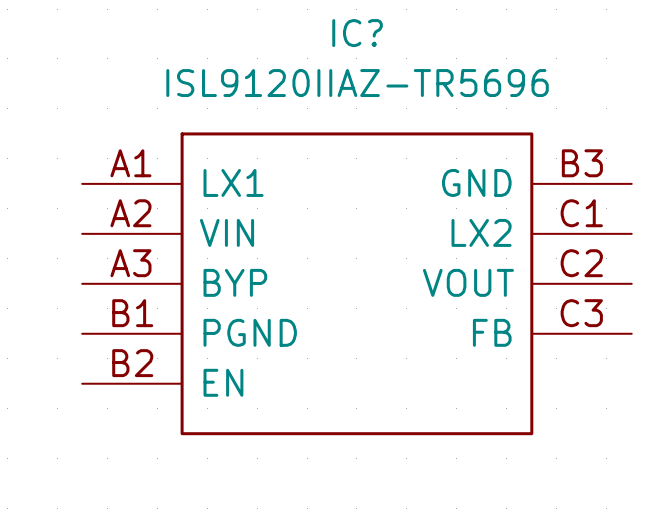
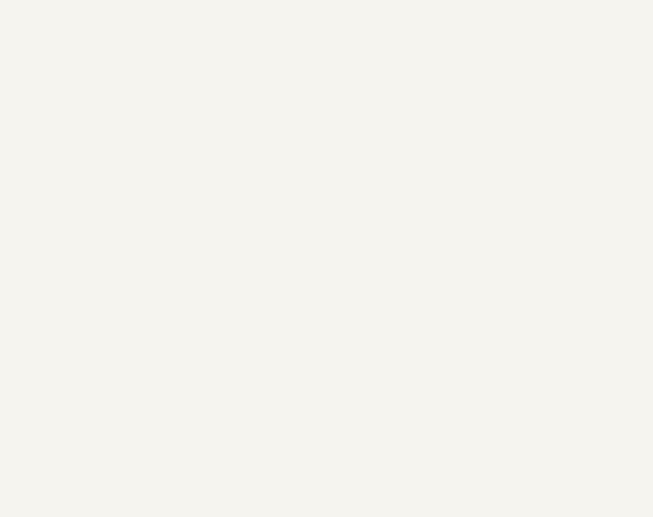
IC?: ISL9120IIAZ-TR5696 (356, 283) -> none

